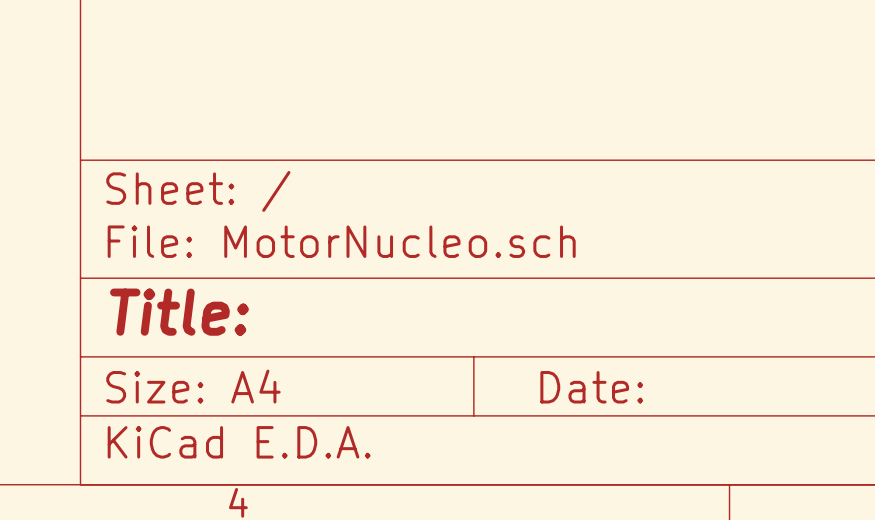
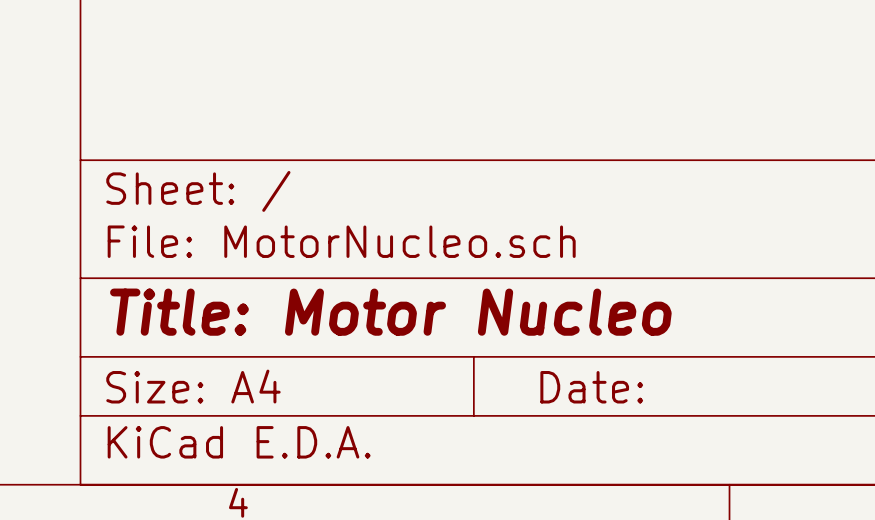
title block: Title: (179, 312) -> Title: Motor Nucleo (390, 312)

